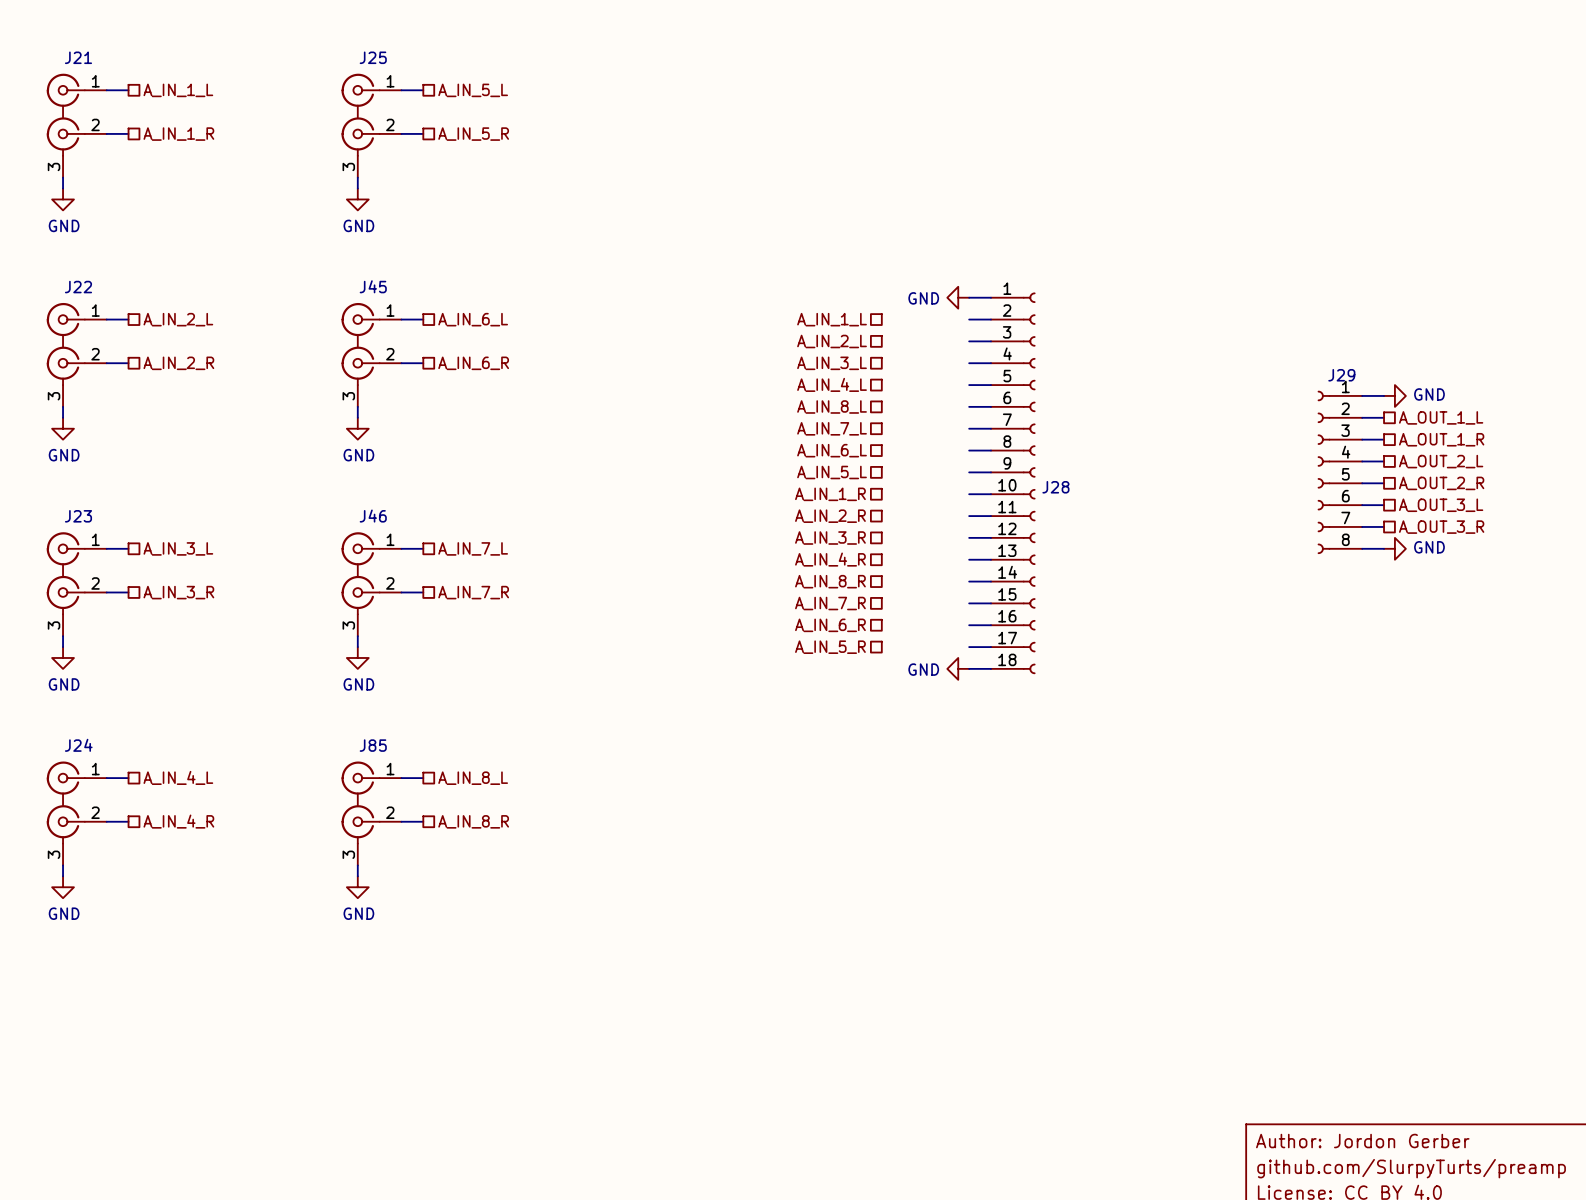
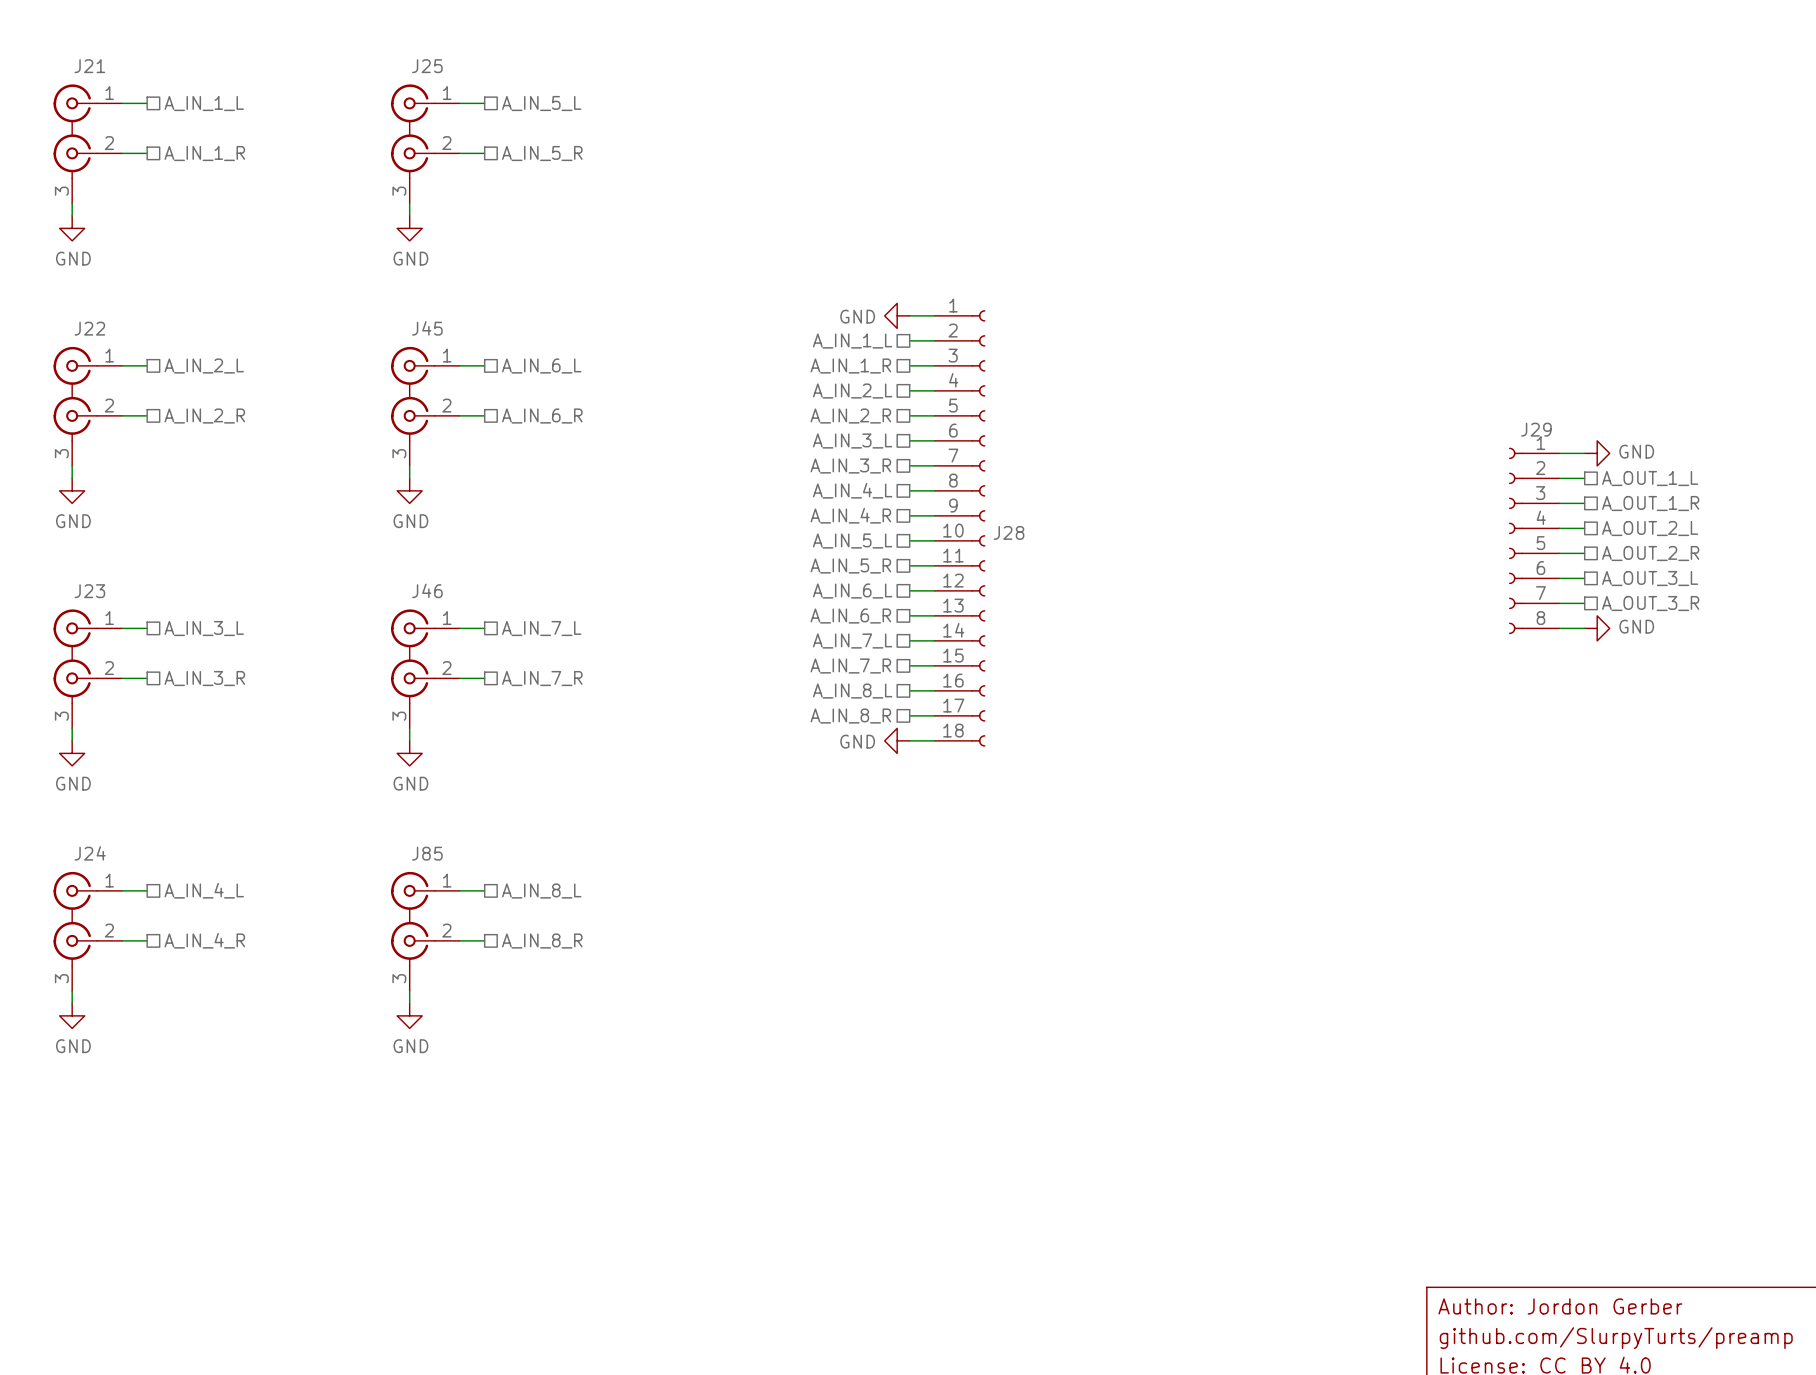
power symbol position: GND (958, 297) -> GND (897, 315)
wire: (969, 297) (991, 297) -> (909, 315) (934, 315)
hierarchical label position: A_IN_1_L (832, 319) -> A_IN_1_L (852, 341)
wire: (969, 319) (991, 319) -> (909, 340) (934, 340)
hierarchical label position: A_IN_2_L (832, 341) -> A_IN_2_L (852, 391)
wire: (969, 341) (991, 341) -> (909, 365) (934, 365)
hierarchical label position: A_IN_3_L (832, 363) -> A_IN_3_L (852, 441)
wire: (969, 363) (991, 363) -> (909, 390) (934, 390)
hierarchical label position: A_IN_4_L (832, 384) -> A_IN_4_L (852, 490)
wire: (969, 385) (991, 385) -> (909, 415) (934, 415)
wire: (969, 406) (991, 406) -> (909, 440) (934, 440)
hierarchical label: A_IN_8_L (832, 407) -> none
hierarchical label position: A_IN_7_L (832, 428) -> A_IN_7_L (852, 641)
wire: (969, 428) (991, 428) -> (909, 465) (934, 465)
hierarchical label position: A_IN_6_L (832, 450) -> A_IN_6_L (852, 591)
wire: (969, 450) (991, 450) -> (909, 490) (934, 490)
hierarchical label position: A_IN_5_L (832, 472) -> A_IN_5_L (852, 541)
wire: (969, 472) (991, 472) -> (909, 515) (934, 515)
J28 position: (1013, 483) -> (960, 528)
hierarchical label position: A_IN_1_R (830, 494) -> A_IN_1_R (850, 366)
wire: (969, 494) (991, 494) -> (909, 540) (934, 540)
hierarchical label position: A_IN_2_R (830, 516) -> A_IN_2_R (850, 416)
wire: (969, 516) (991, 516) -> (909, 565) (934, 565)
wire: (969, 537) (991, 537) -> (909, 590) (934, 590)
hierarchical label position: A_IN_3_R (830, 538) -> A_IN_3_R (850, 466)
hierarchical label position: A_IN_4_R (830, 559) -> A_IN_4_R (850, 515)
wire: (969, 559) (991, 559) -> (909, 615) (934, 615)
hierarchical label position: A_IN_8_R (830, 581) -> A_IN_8_R (850, 716)
wire: (969, 581) (991, 581) -> (909, 640) (934, 640)
hierarchical label: none -> A_IN_8_L (852, 691)
hierarchical label position: A_IN_7_R (830, 603) -> A_IN_7_R (850, 666)
wire: (969, 603) (991, 603) -> (909, 665) (934, 665)
hierarchical label position: A_IN_6_R (830, 625) -> A_IN_6_R (850, 616)
wire: (969, 625) (991, 625) -> (909, 690) (934, 690)
hierarchical label position: A_IN_5_R (830, 647) -> A_IN_5_R (850, 566)
wire: (969, 647) (991, 647) -> (909, 715) (934, 715)
power symbol position: GND (958, 668) -> GND (897, 740)
wire: (969, 668) (991, 668) -> (909, 740) (934, 740)

